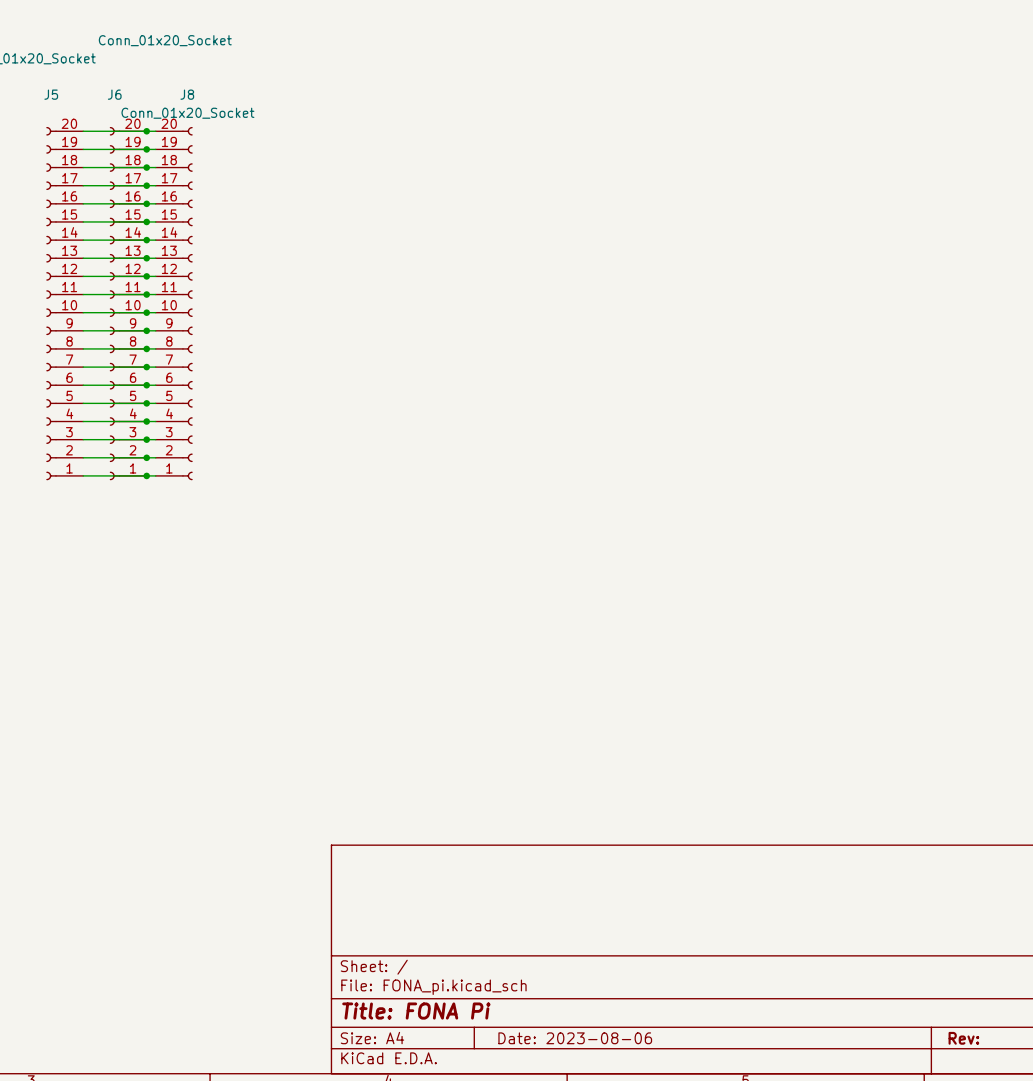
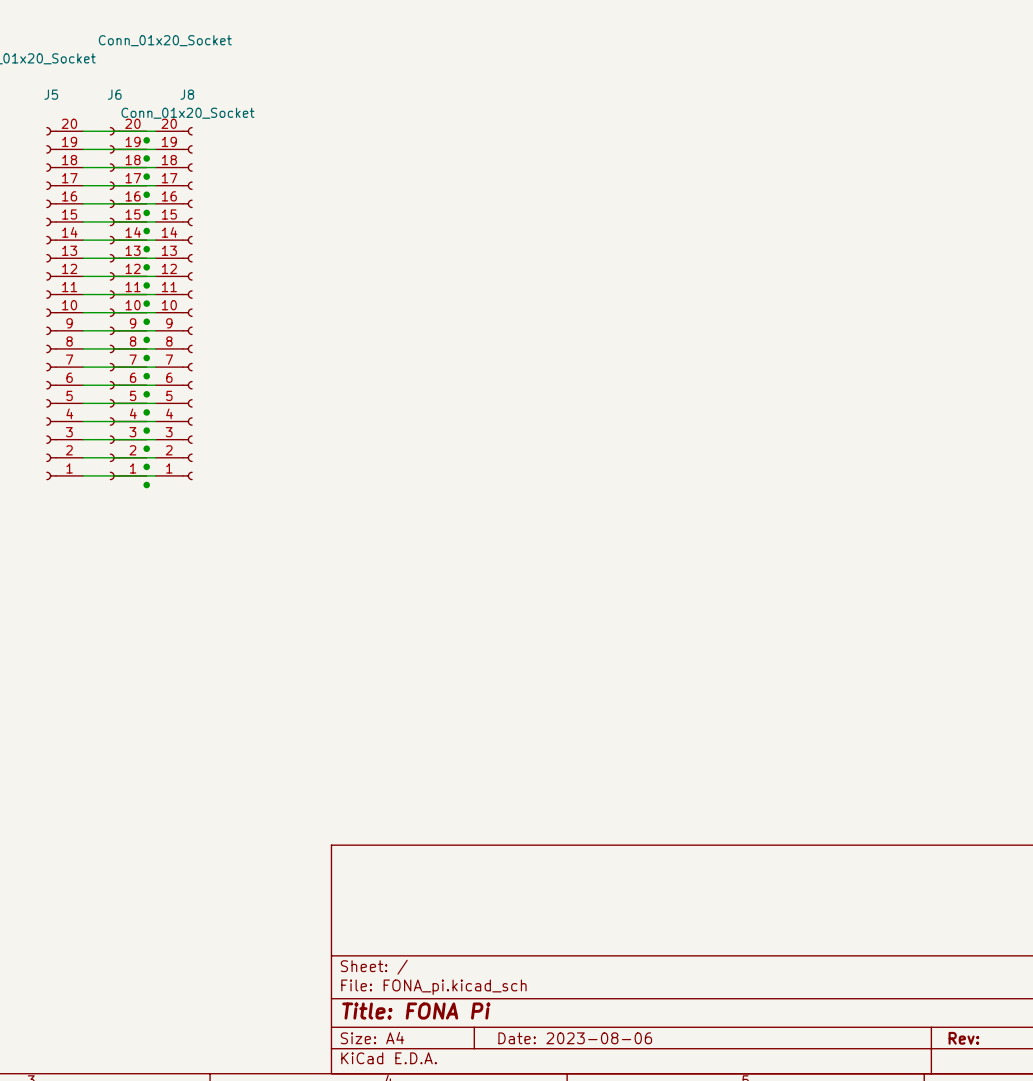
junction: (146, 131) -> none
junction: none -> (146, 140)
junction: (146, 149) -> none
junction: none -> (146, 158)
junction: (146, 167) -> none
junction: none -> (146, 176)
junction: (146, 185) -> none
junction: none -> (146, 194)
junction: (146, 203) -> none
junction: none -> (146, 212)
junction: (146, 221) -> none
junction: none -> (146, 231)
junction: (146, 240) -> none
junction: none -> (146, 249)
junction: (146, 258) -> none
junction: none -> (146, 267)
junction: (146, 276) -> none
junction: none -> (146, 285)
junction: (146, 294) -> none
junction: none -> (146, 303)
junction: (146, 312) -> none
junction: none -> (146, 321)
junction: (146, 330) -> none
junction: none -> (146, 339)
junction: (146, 348) -> none
junction: none -> (146, 358)
junction: (146, 367) -> none
junction: none -> (146, 376)
junction: (146, 385) -> none
junction: none -> (146, 394)
junction: (146, 403) -> none
junction: none -> (146, 412)
junction: (146, 421) -> none
junction: none -> (146, 430)
junction: (146, 439) -> none
junction: none -> (146, 448)
junction: (146, 457) -> none
junction: none -> (146, 466)
junction: (146, 475) -> none
junction: none -> (146, 485)

